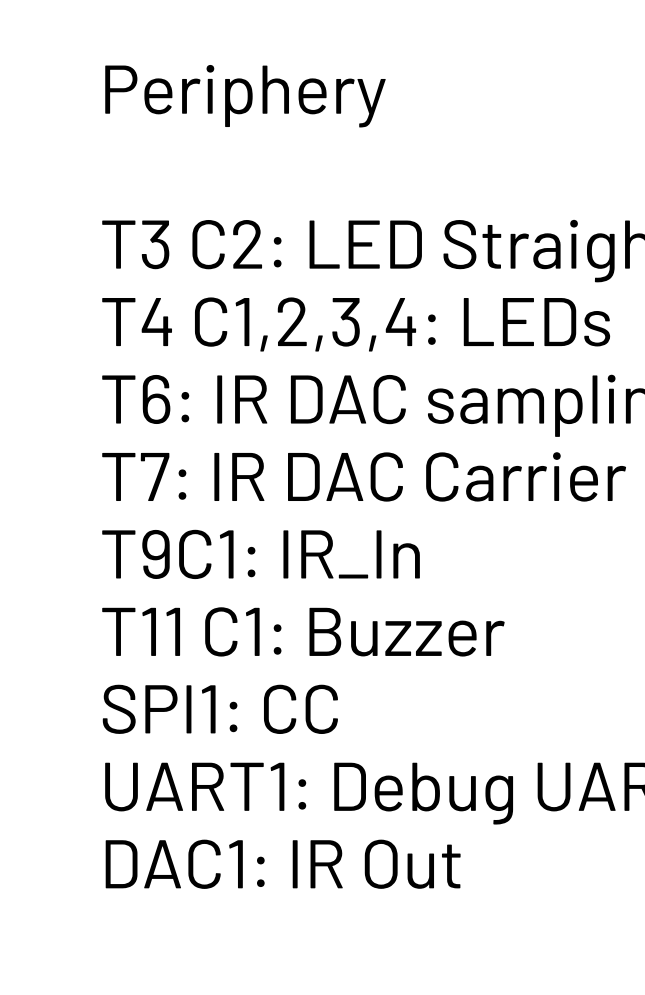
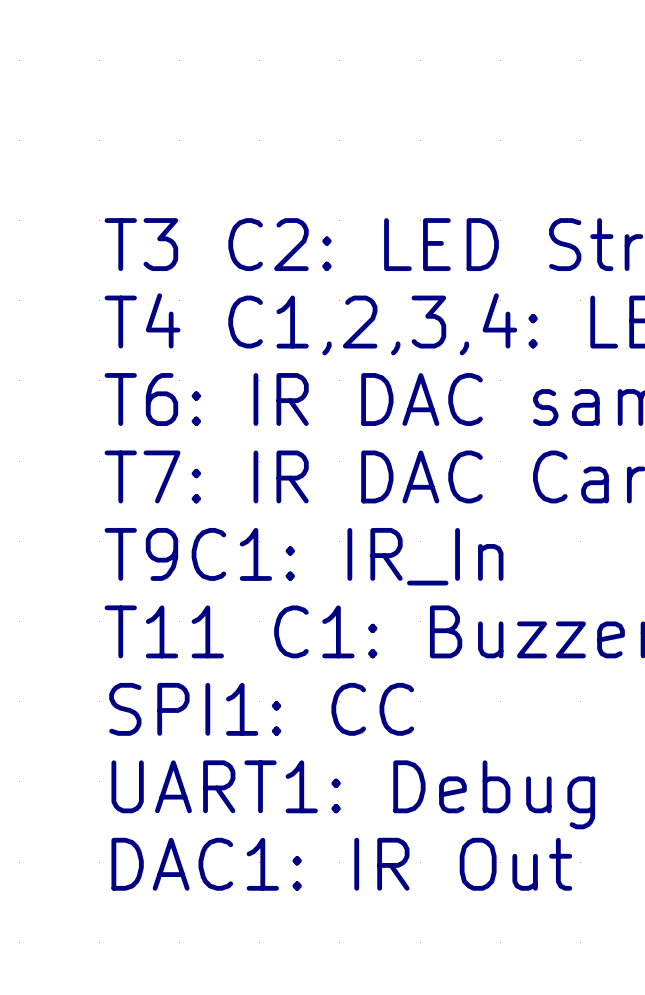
text: Periphery (245, 96) -> none

